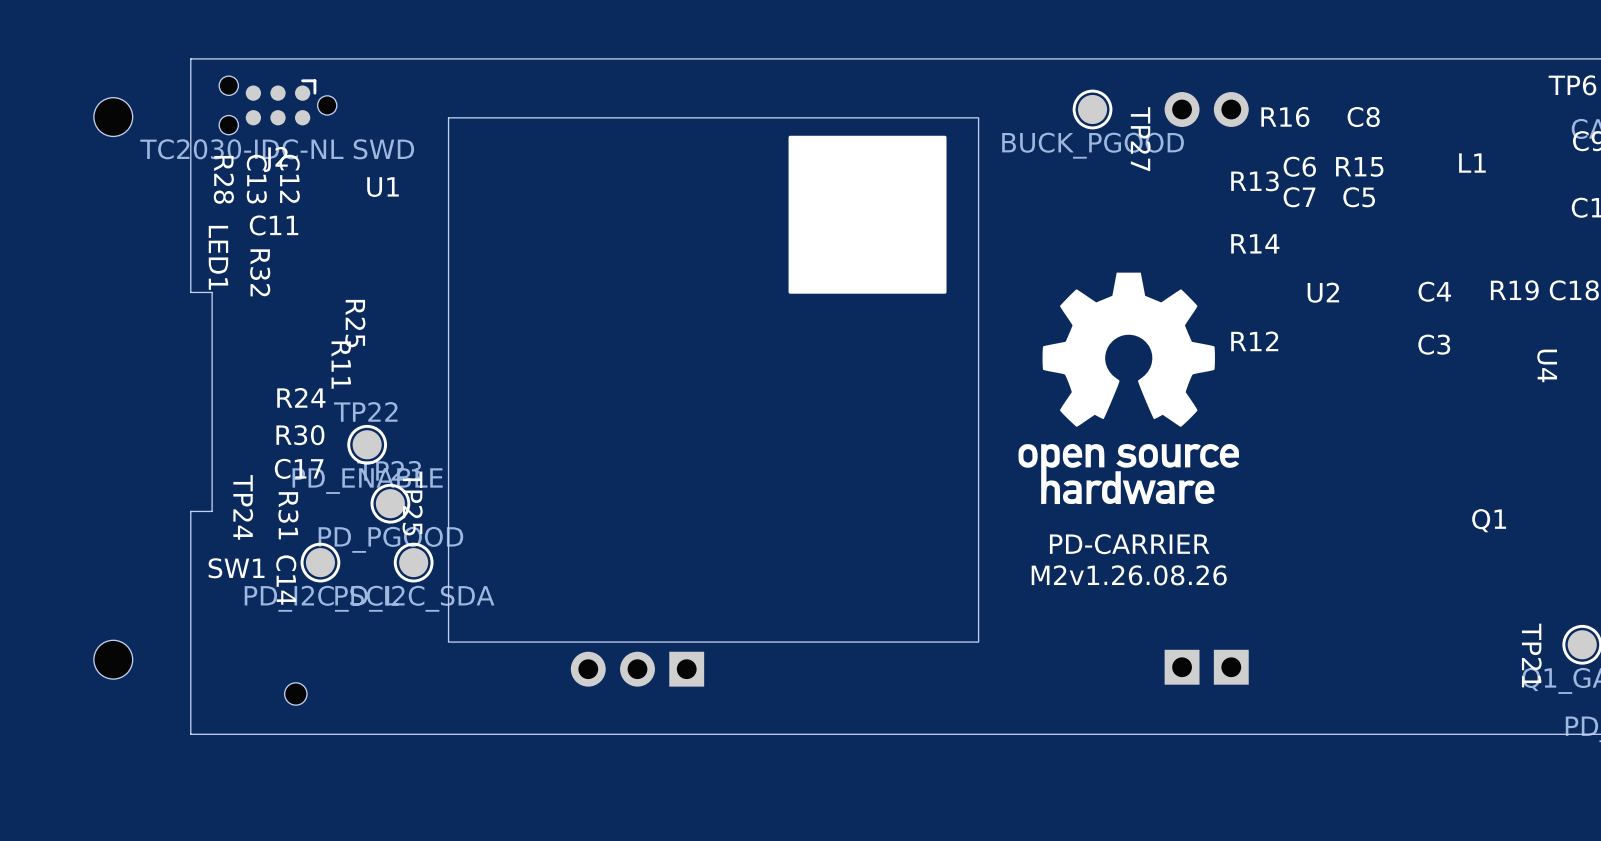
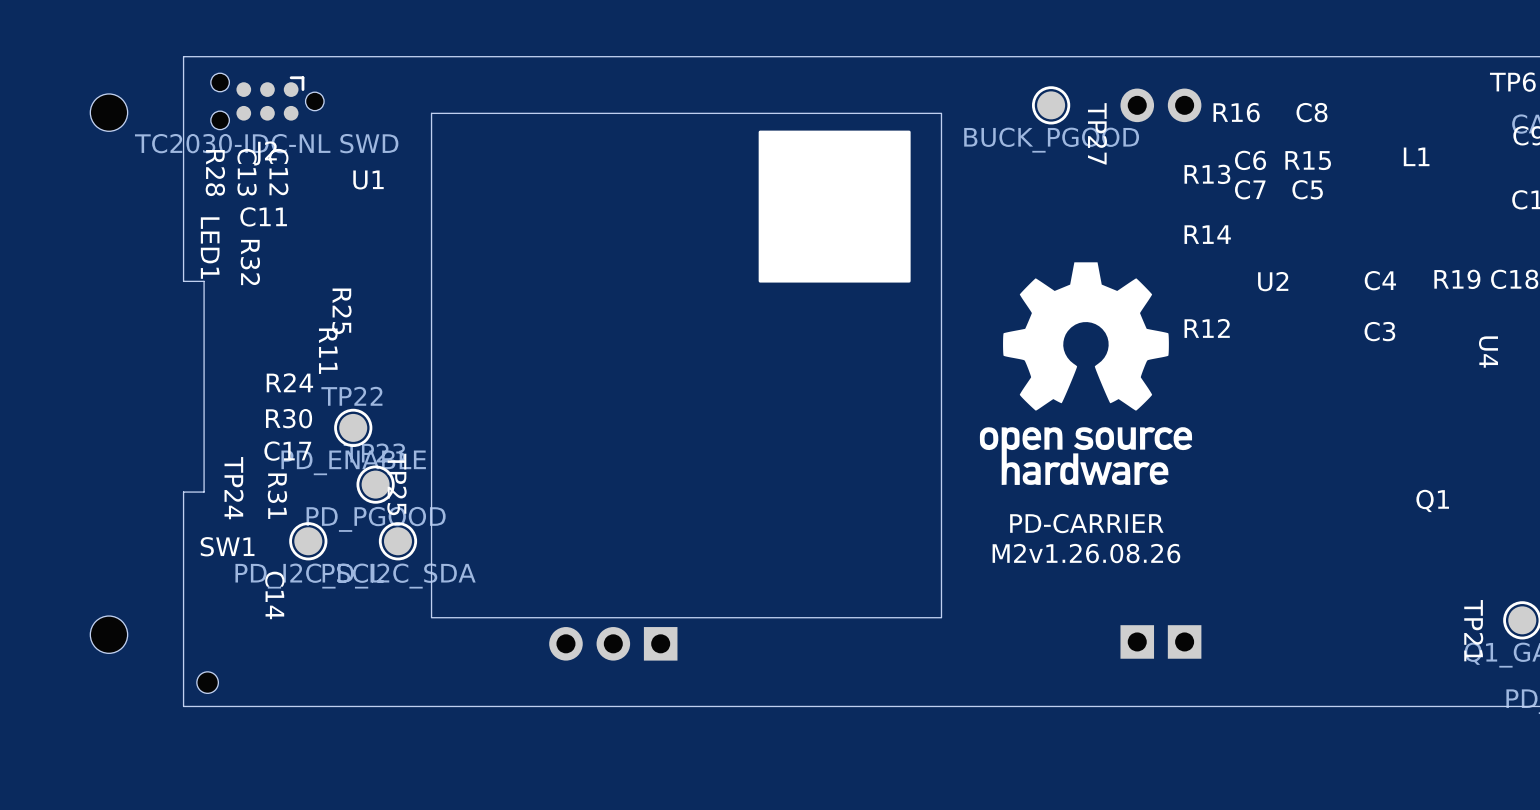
C14 position: (286, 580) -> (274, 595)
part position: (295, 693) -> (207, 682)

